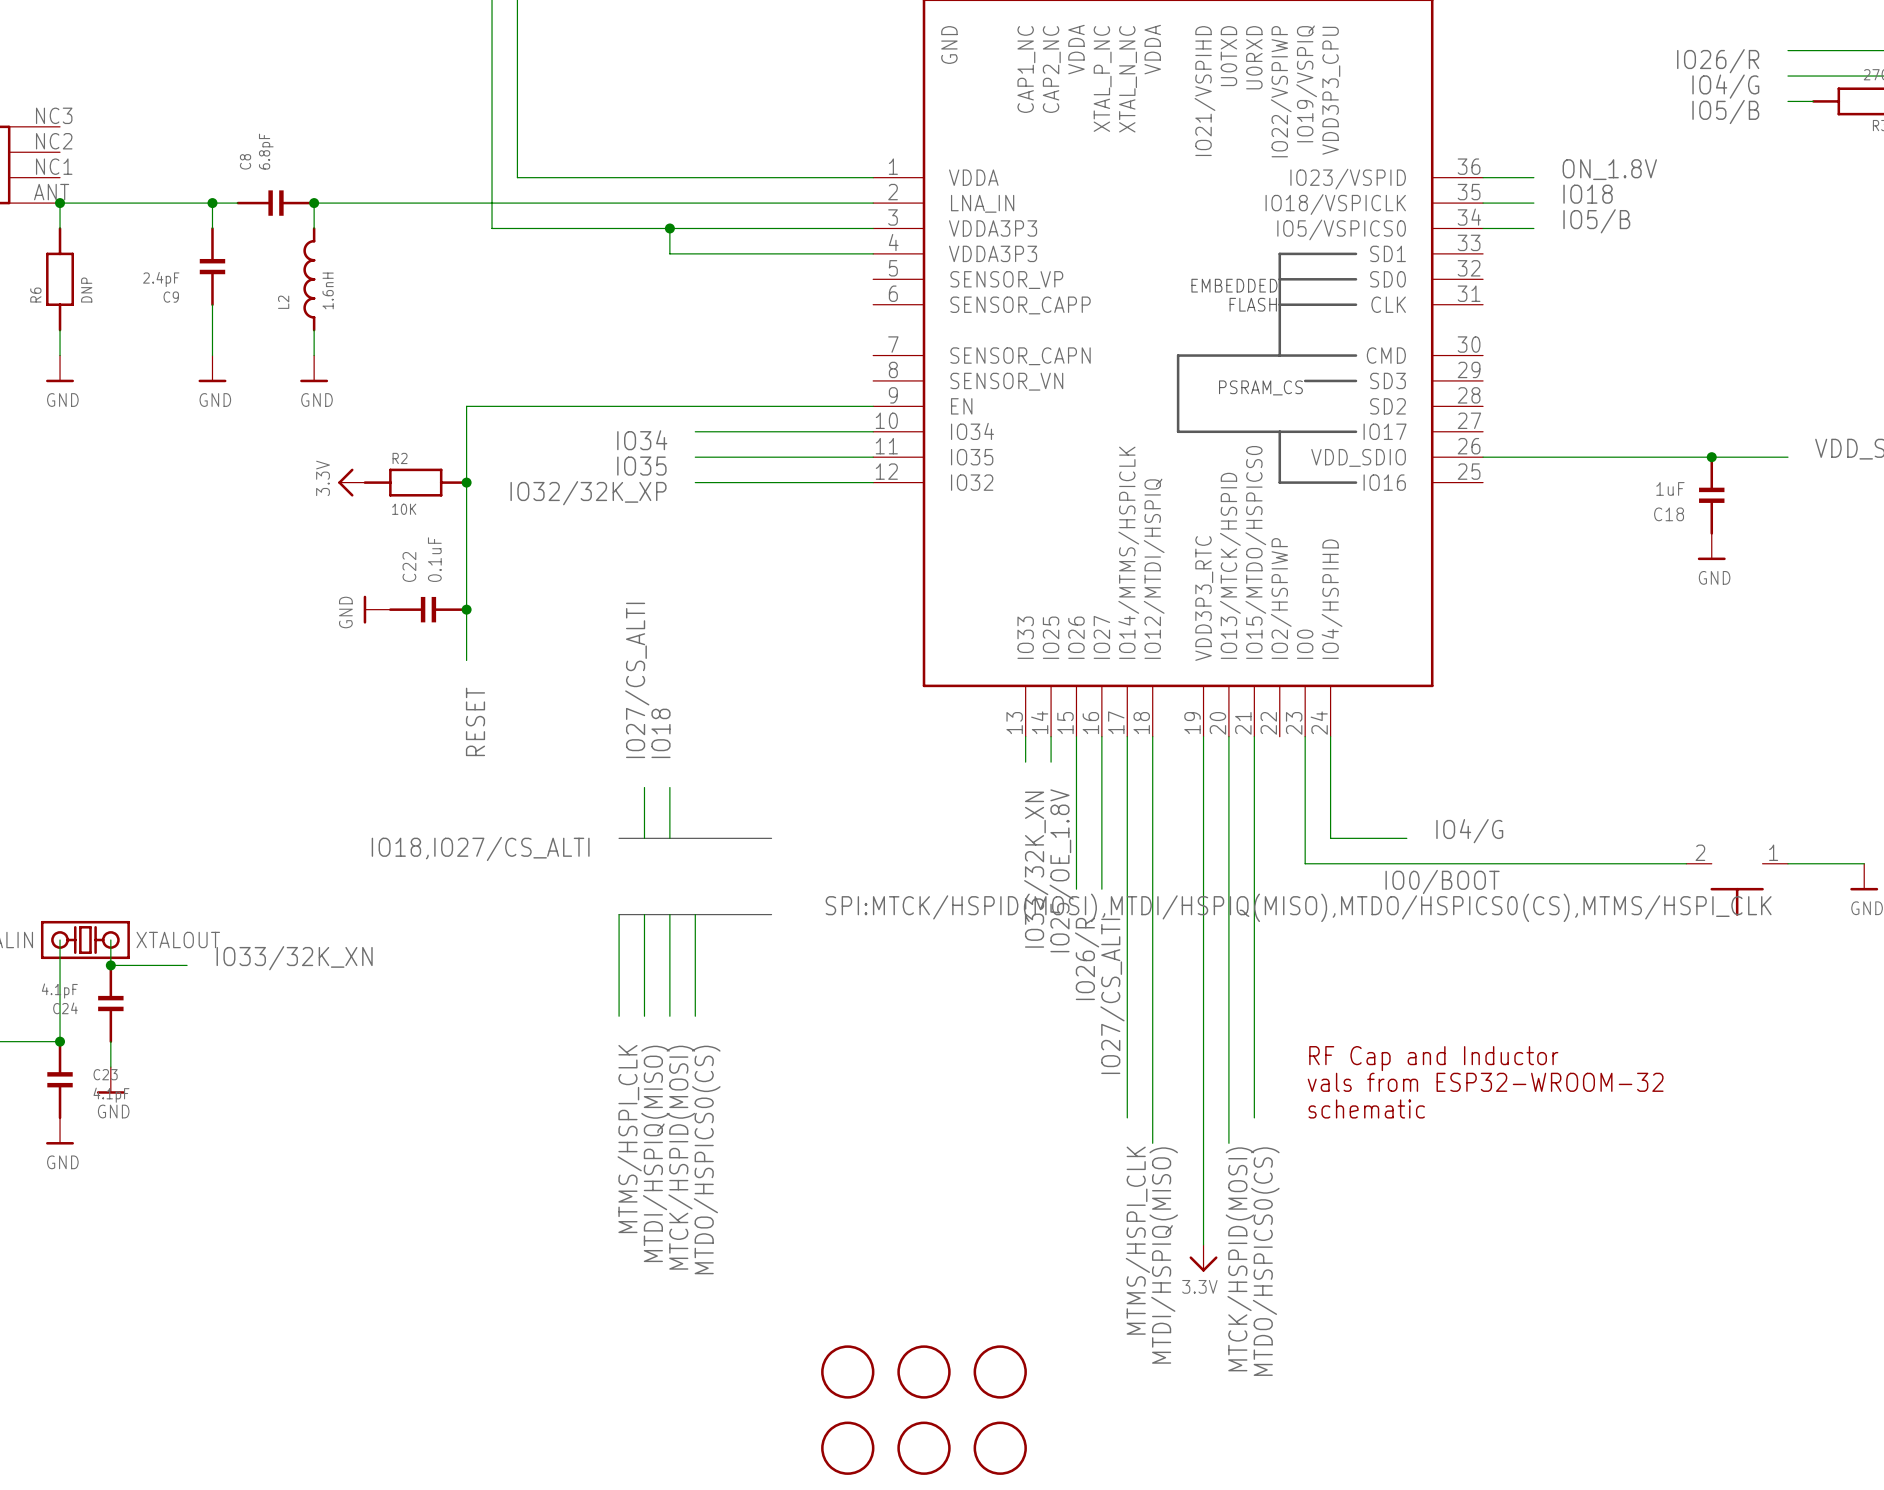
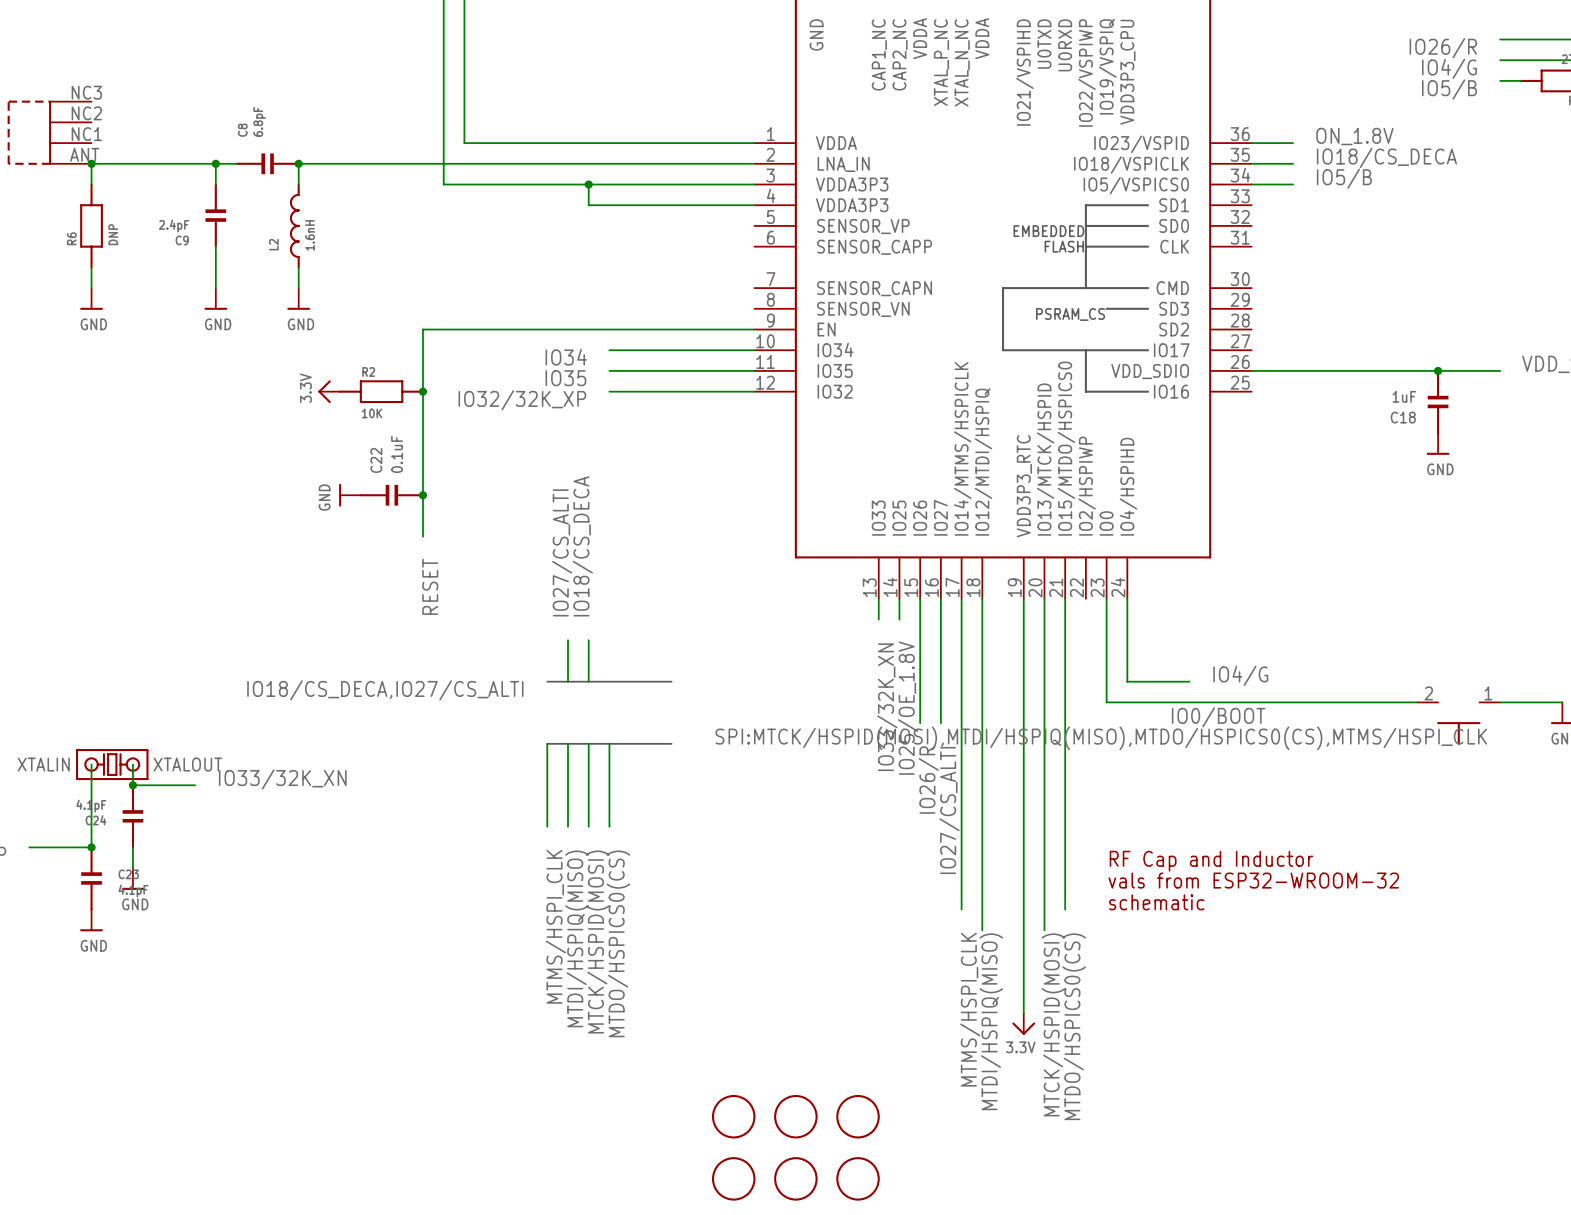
label: IO18 (1588, 194) -> IO18/CS_DECA (1386, 157)
label: IO18 (660, 733) -> IO18/CS_DECA (582, 546)
label: IO18,IO27/CS_ALTI (480, 848) -> IO18/CS_DECA,IO27/CS_ALTI (385, 690)

